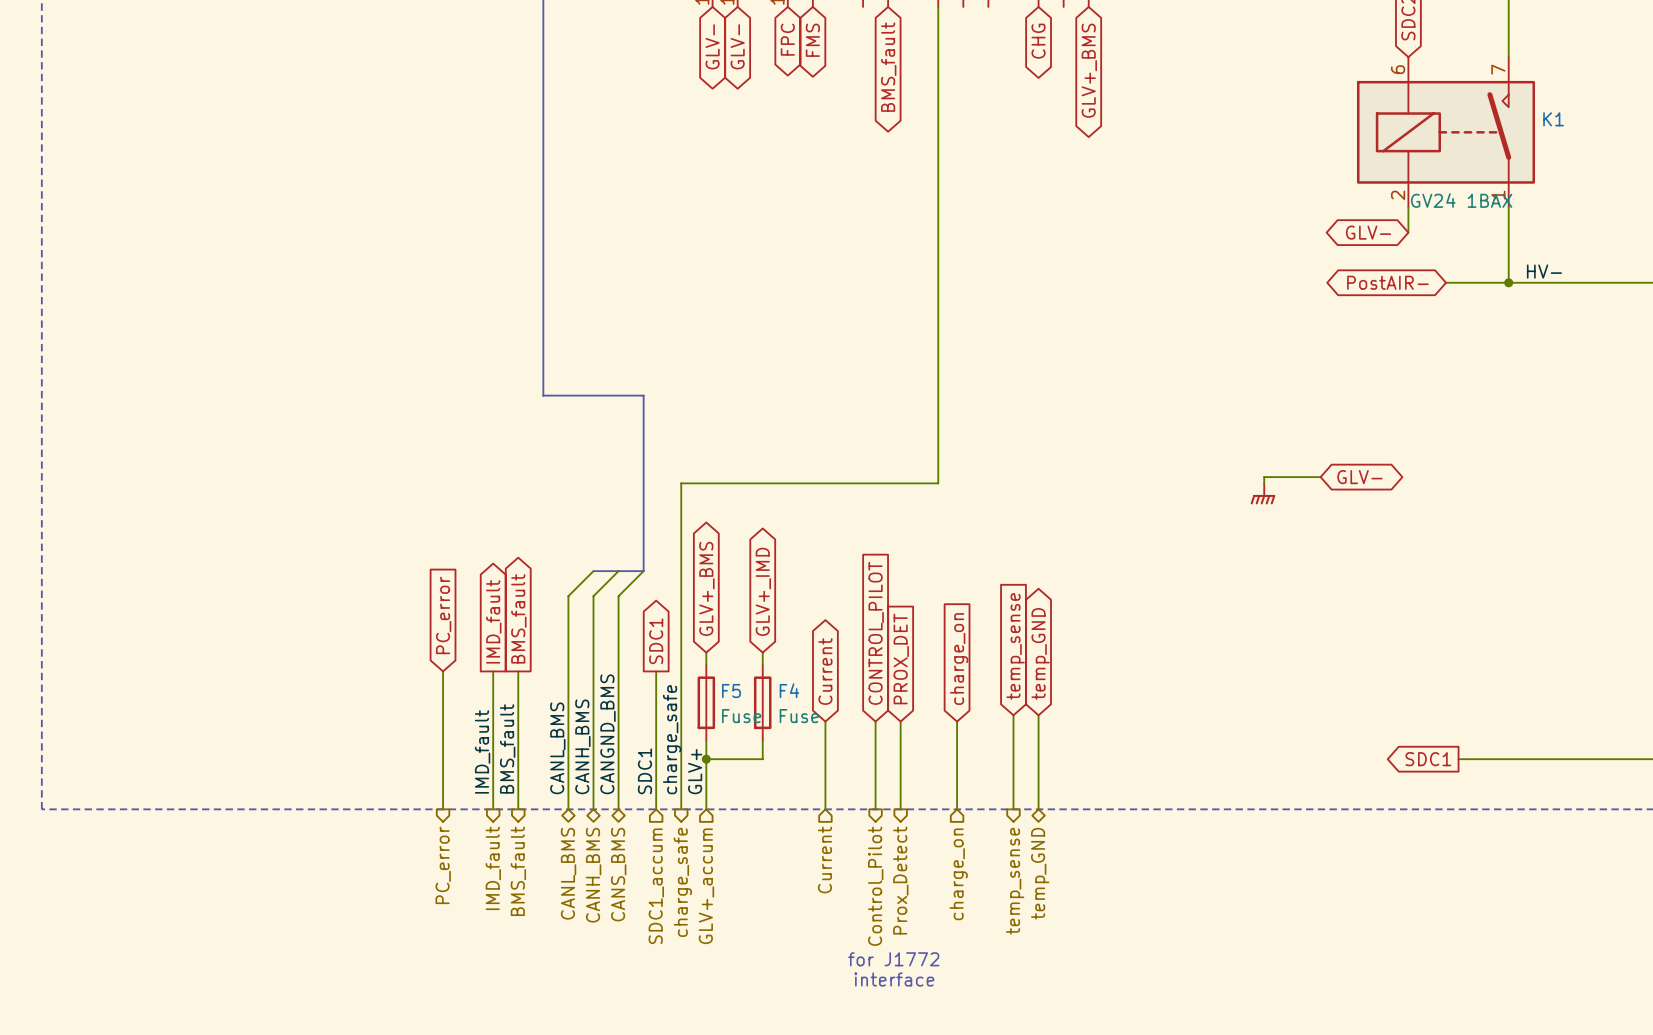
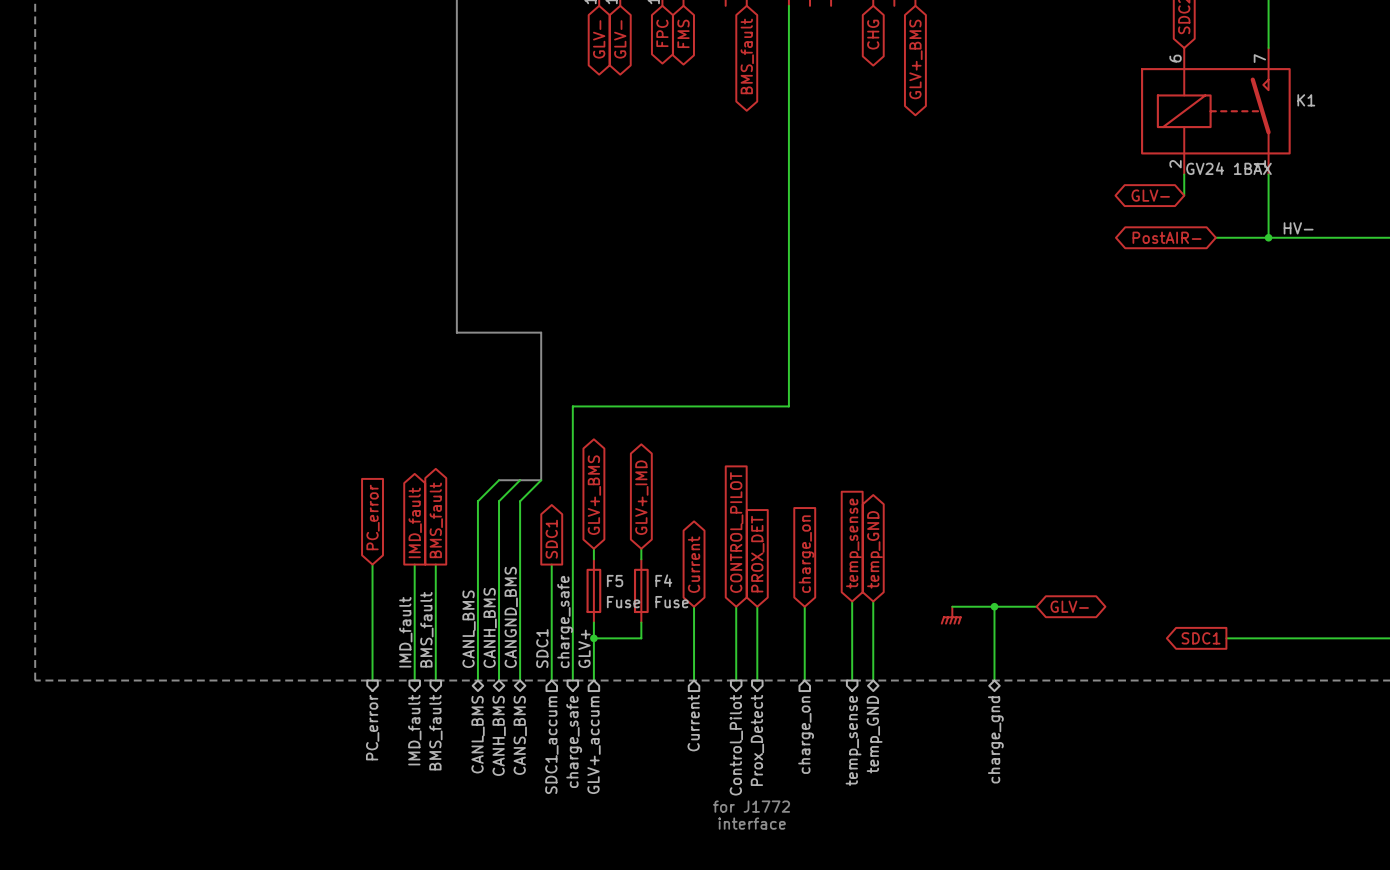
wire: (1320, 477) (1264, 477) (1264, 483) -> none
global label: GLV- (1359, 477) -> none
power symbol: (1262, 493) -> none
wire: none -> (952, 606) (1036, 606)
wire: none -> (994, 606) (994, 680)
junction: none -> (994, 606)
global label: none -> GLV- (1069, 606)
power symbol: none -> (951, 615)
hierarchical label: none -> charge_gnd (995, 739)

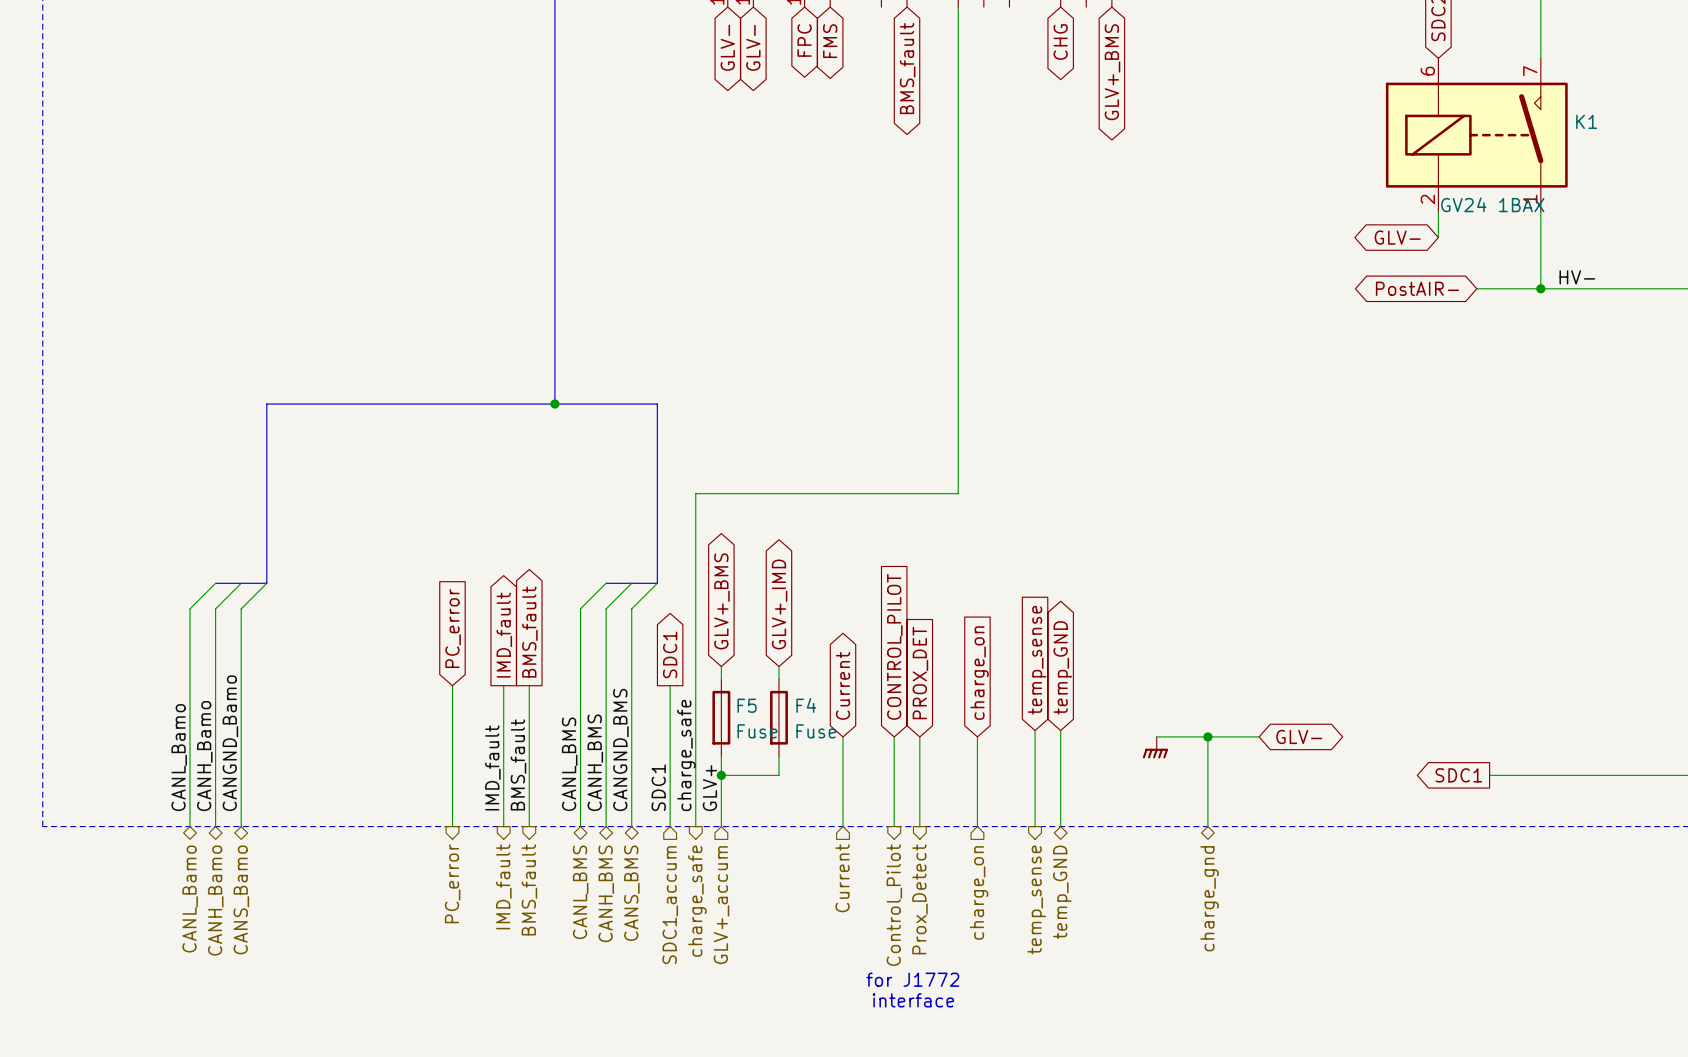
bus: none -> (554, 404) (266, 404) (266, 583) (215, 583)
junction: none -> (554, 404)
wire: none -> (215, 583) (189, 608) (189, 826)
wire: none -> (241, 583) (215, 608) (215, 826)
wire: none -> (266, 583) (241, 608) (241, 826)
label: none -> CANGND_Bamo (230, 743)
label: none -> CANH_Bamo (204, 756)
label: none -> CANL_Bamo (179, 757)
hierarchical label: none -> CANL_Bamo (190, 899)
hierarchical label: none -> CANS_Bamo (241, 899)
hierarchical label: none -> CANH_Bamo (215, 900)

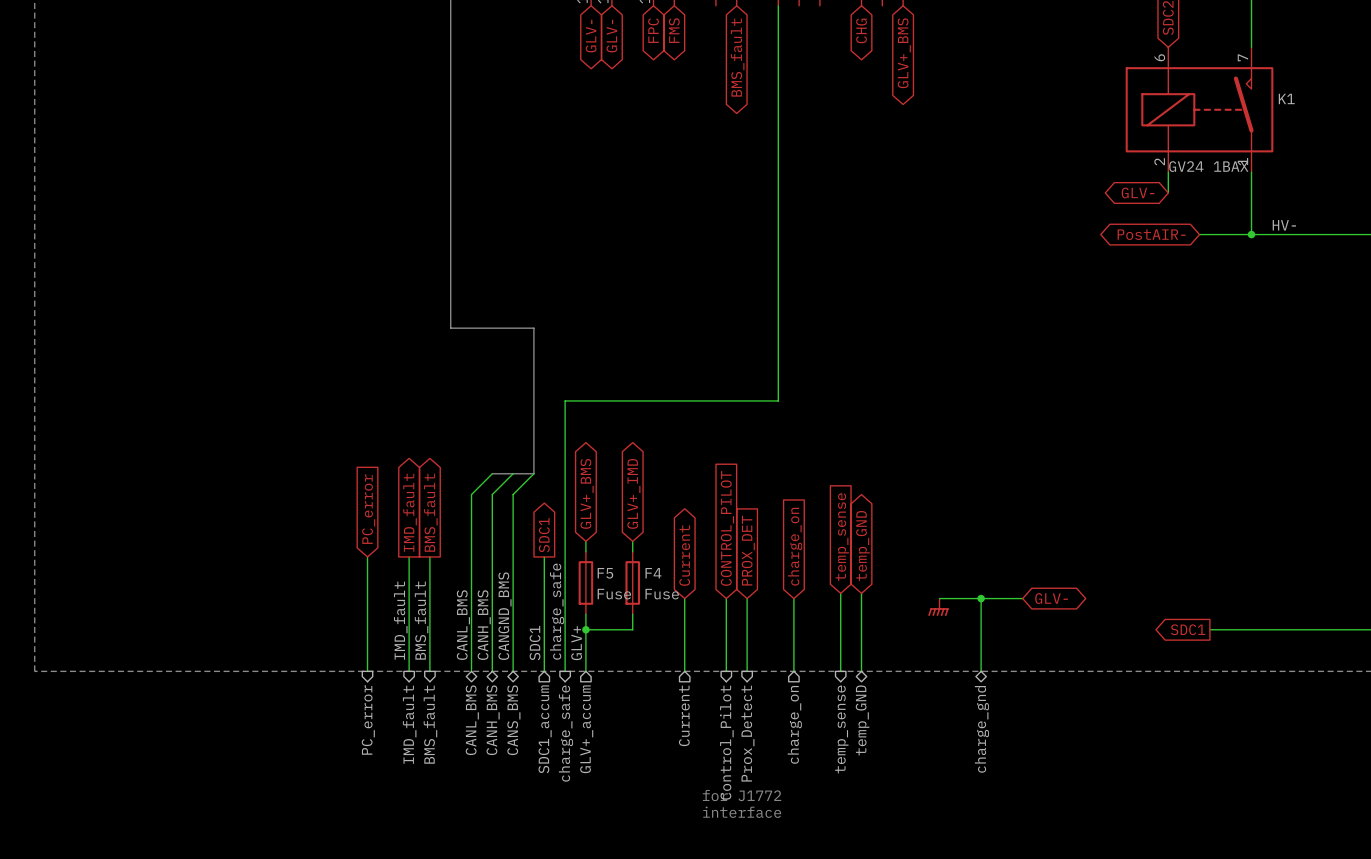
bus: (554, 404) (266, 404) (266, 583) (215, 583) -> none
junction: (554, 404) -> none
wire: (215, 583) (189, 608) (189, 826) -> none
wire: (241, 583) (215, 608) (215, 826) -> none
wire: (266, 583) (241, 608) (241, 826) -> none
label: CANGND_Bamo (230, 743) -> none
label: CANH_Bamo (204, 756) -> none
label: CANL_Bamo (179, 757) -> none
hierarchical label: CANL_Bamo (190, 899) -> none
hierarchical label: CANS_Bamo (241, 899) -> none
hierarchical label: CANH_Bamo (215, 900) -> none

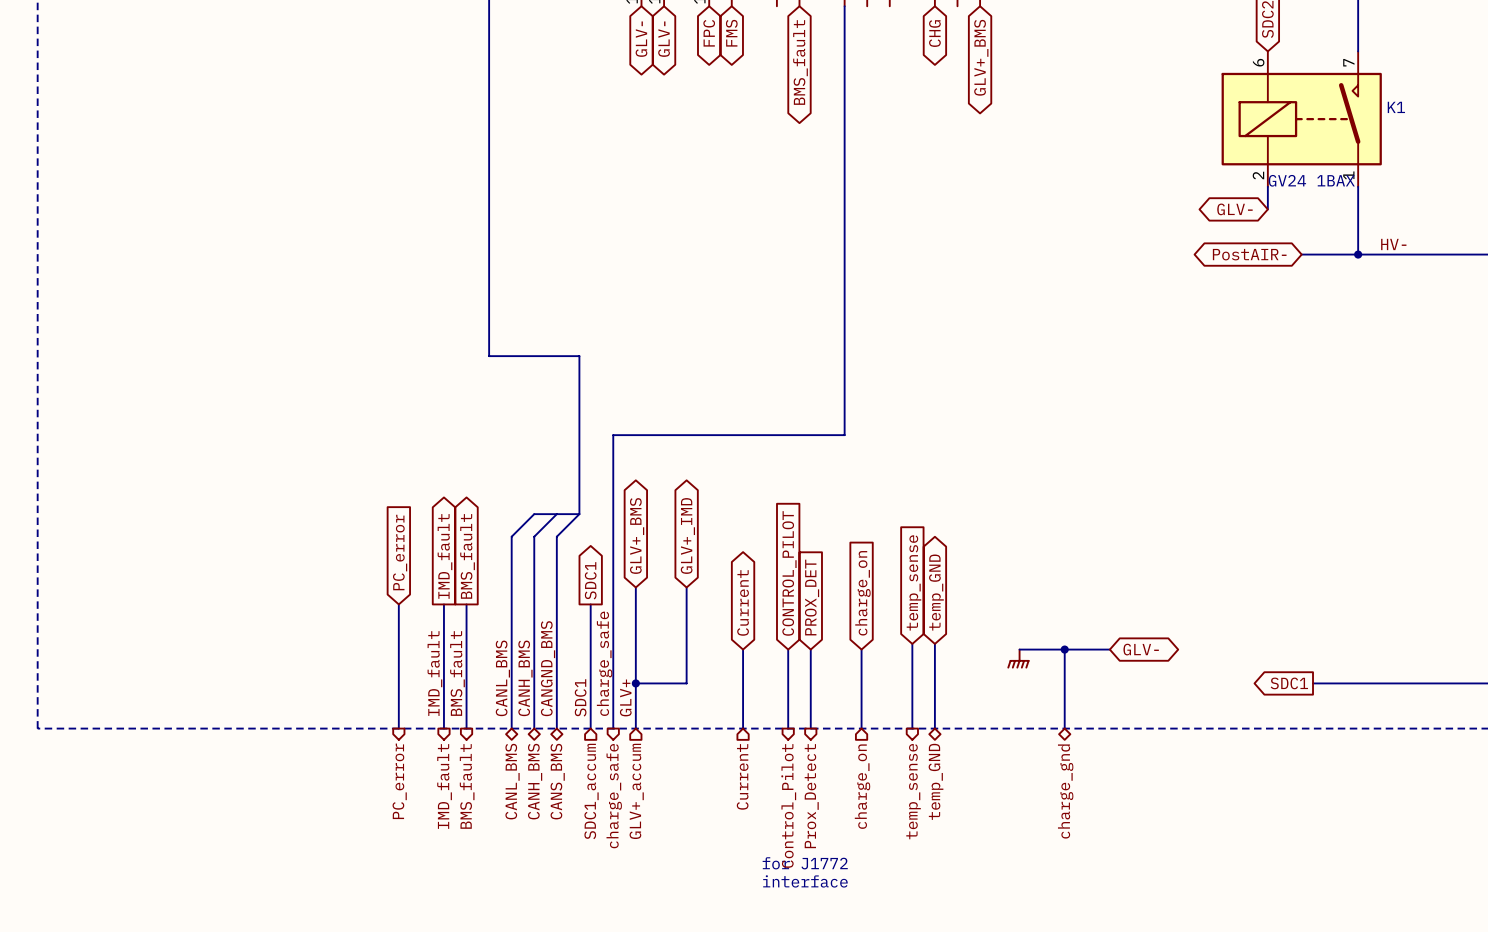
F5: Fuse (585, 582) -> none
F4: Fuse (632, 582) -> none

